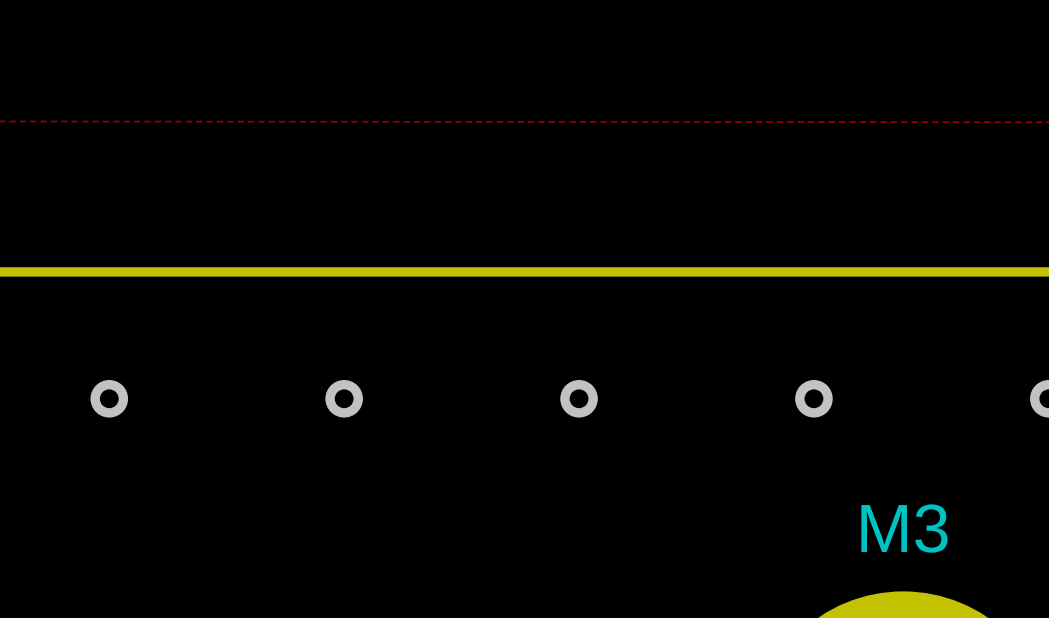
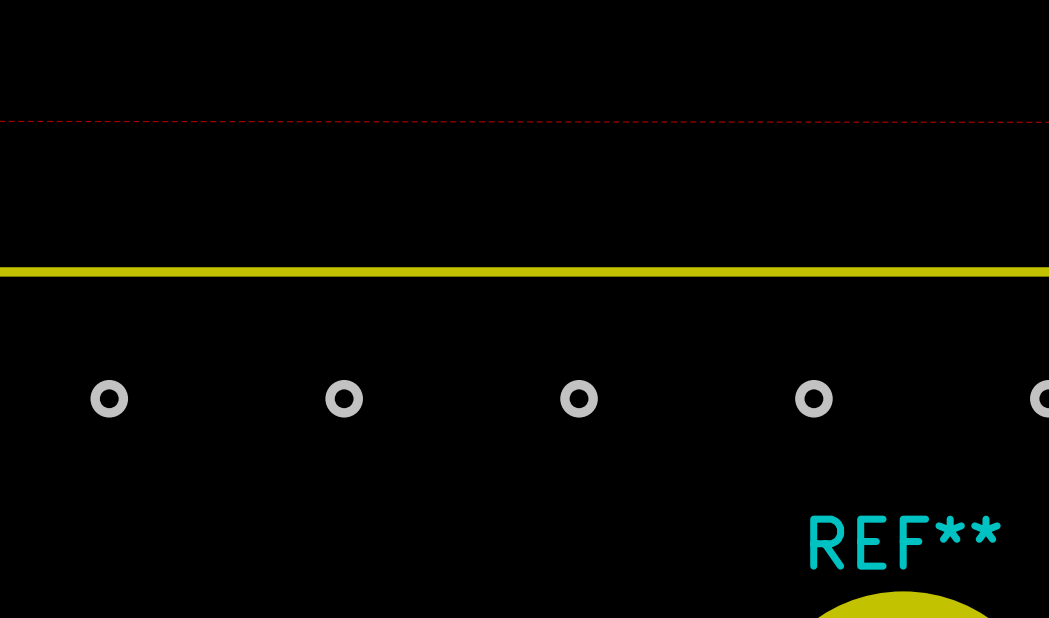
M3 name: M3 (904, 528) -> REF** (905, 542)

